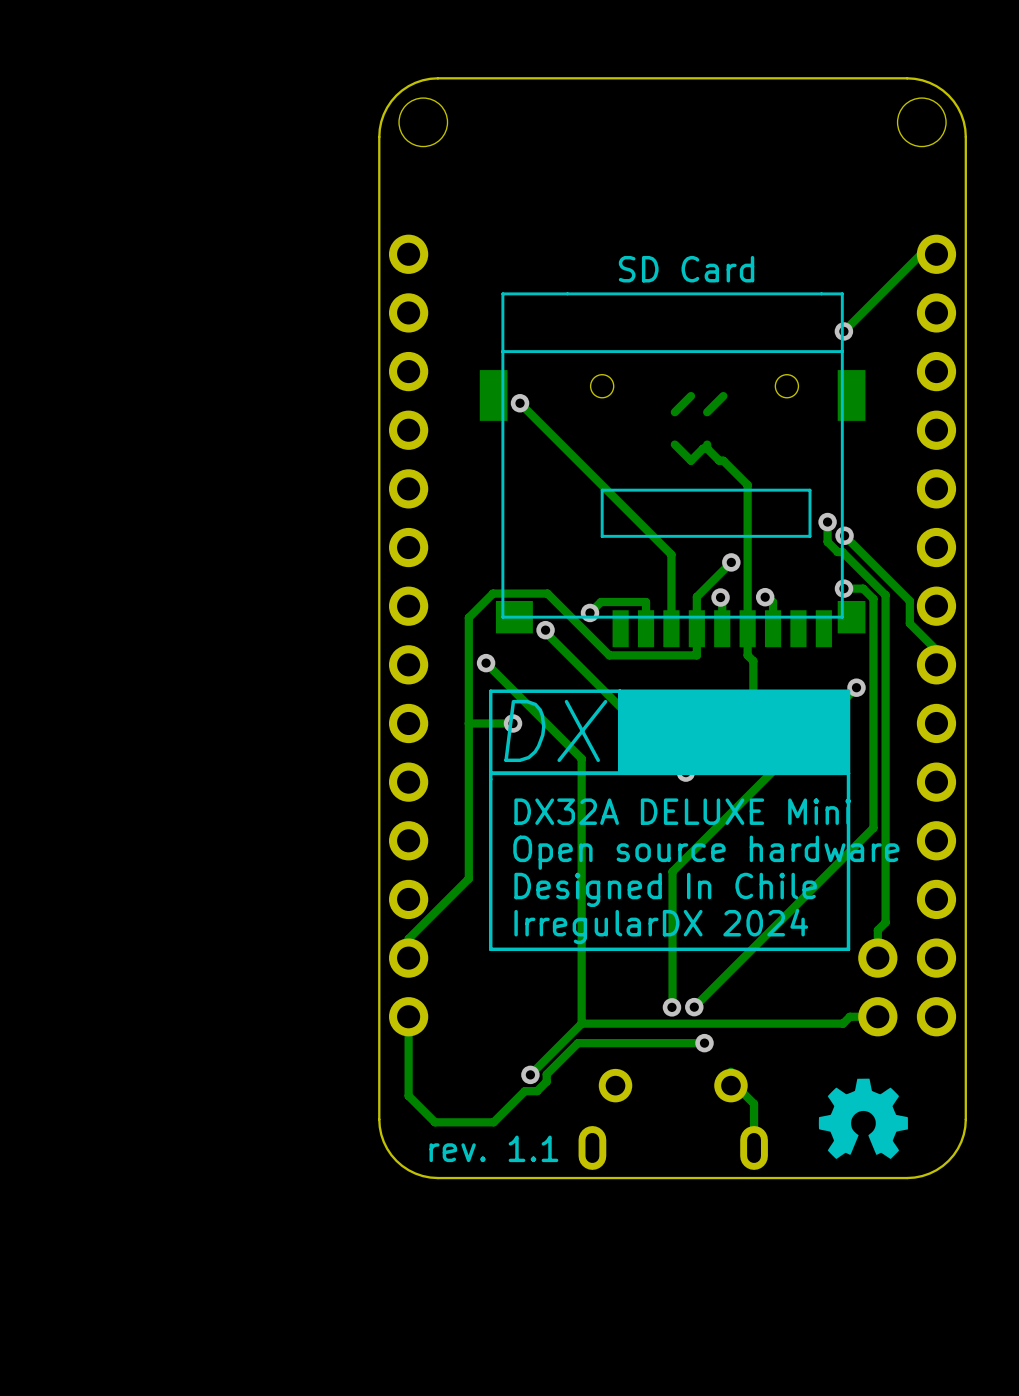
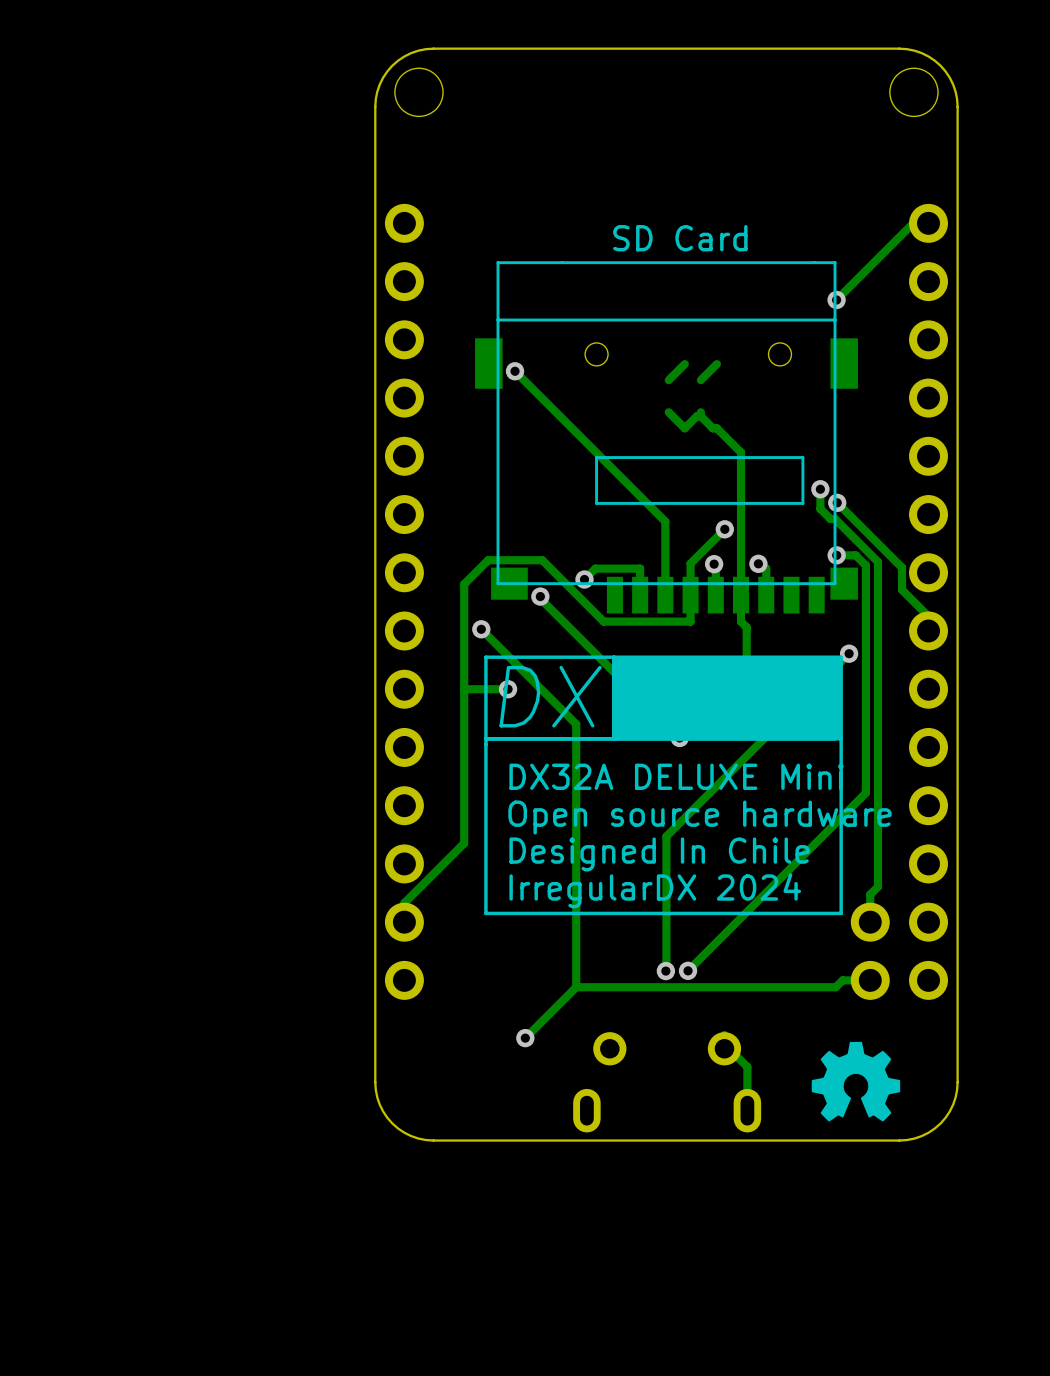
track: (408, 1016) (408, 1095) (435, 1122) (493, 1122) (524, 1091) (537, 1091) (546, 1081) (546, 1074) (577, 1043) (704, 1043) -> none
via: (704, 1043) -> none
text: rev. 1.1 (493, 1148) -> none

